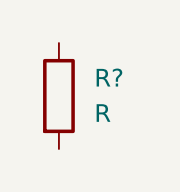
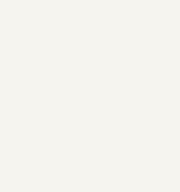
R?: R (58, 96) -> none

